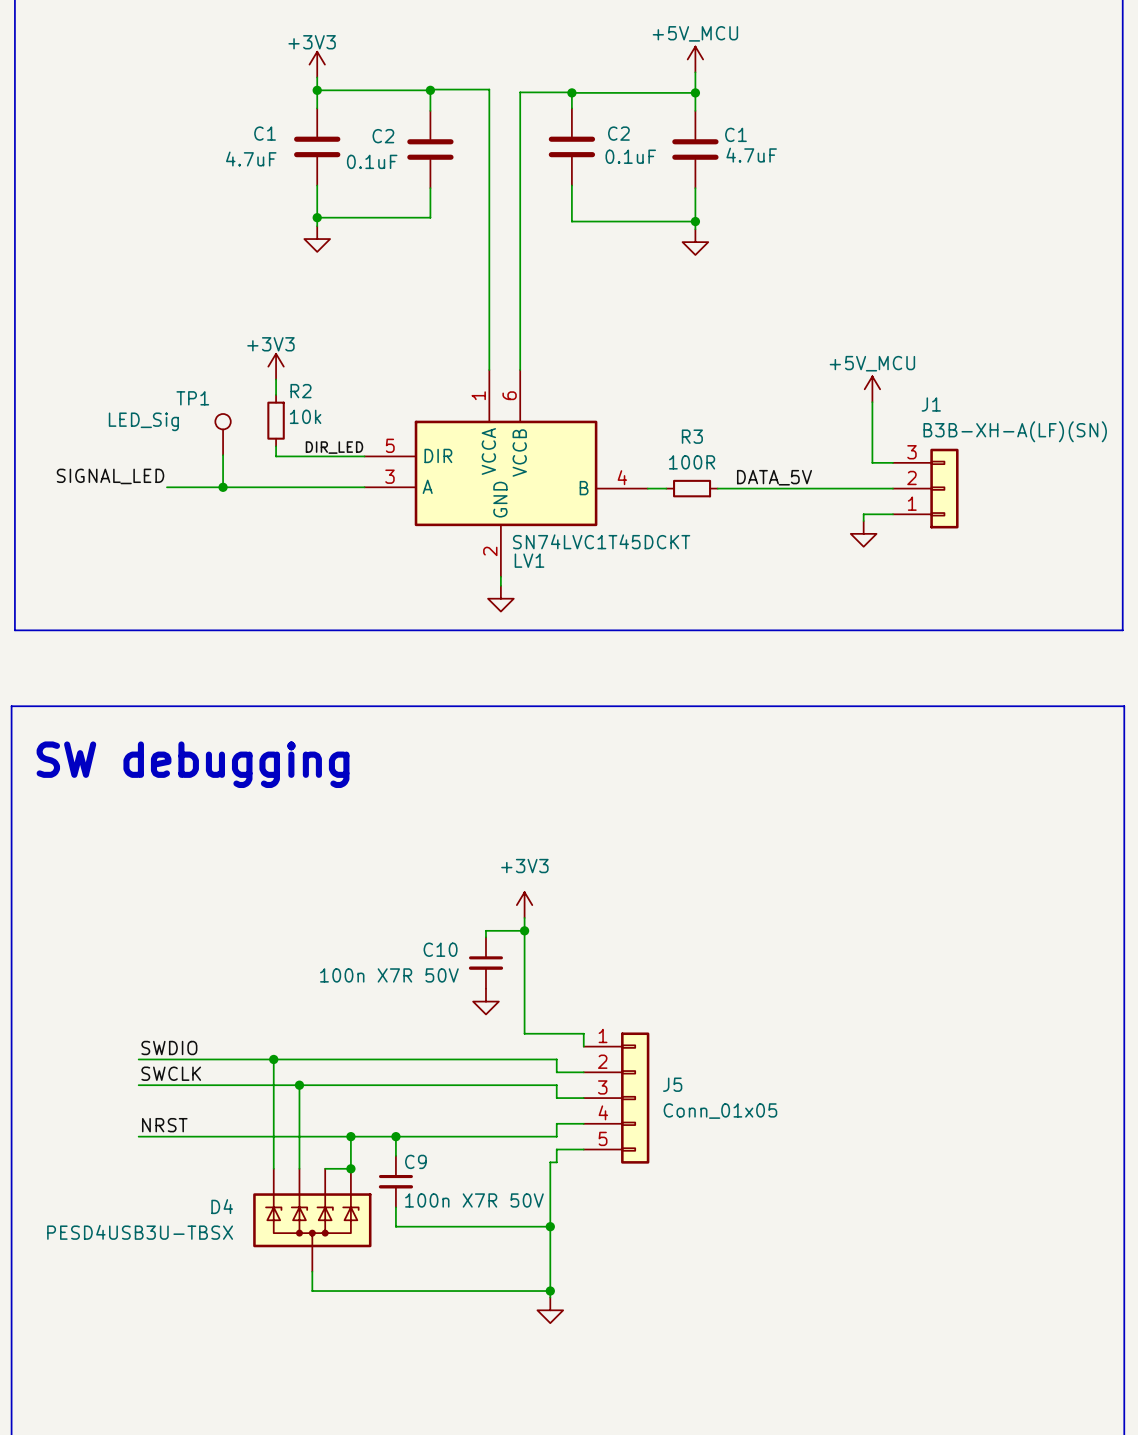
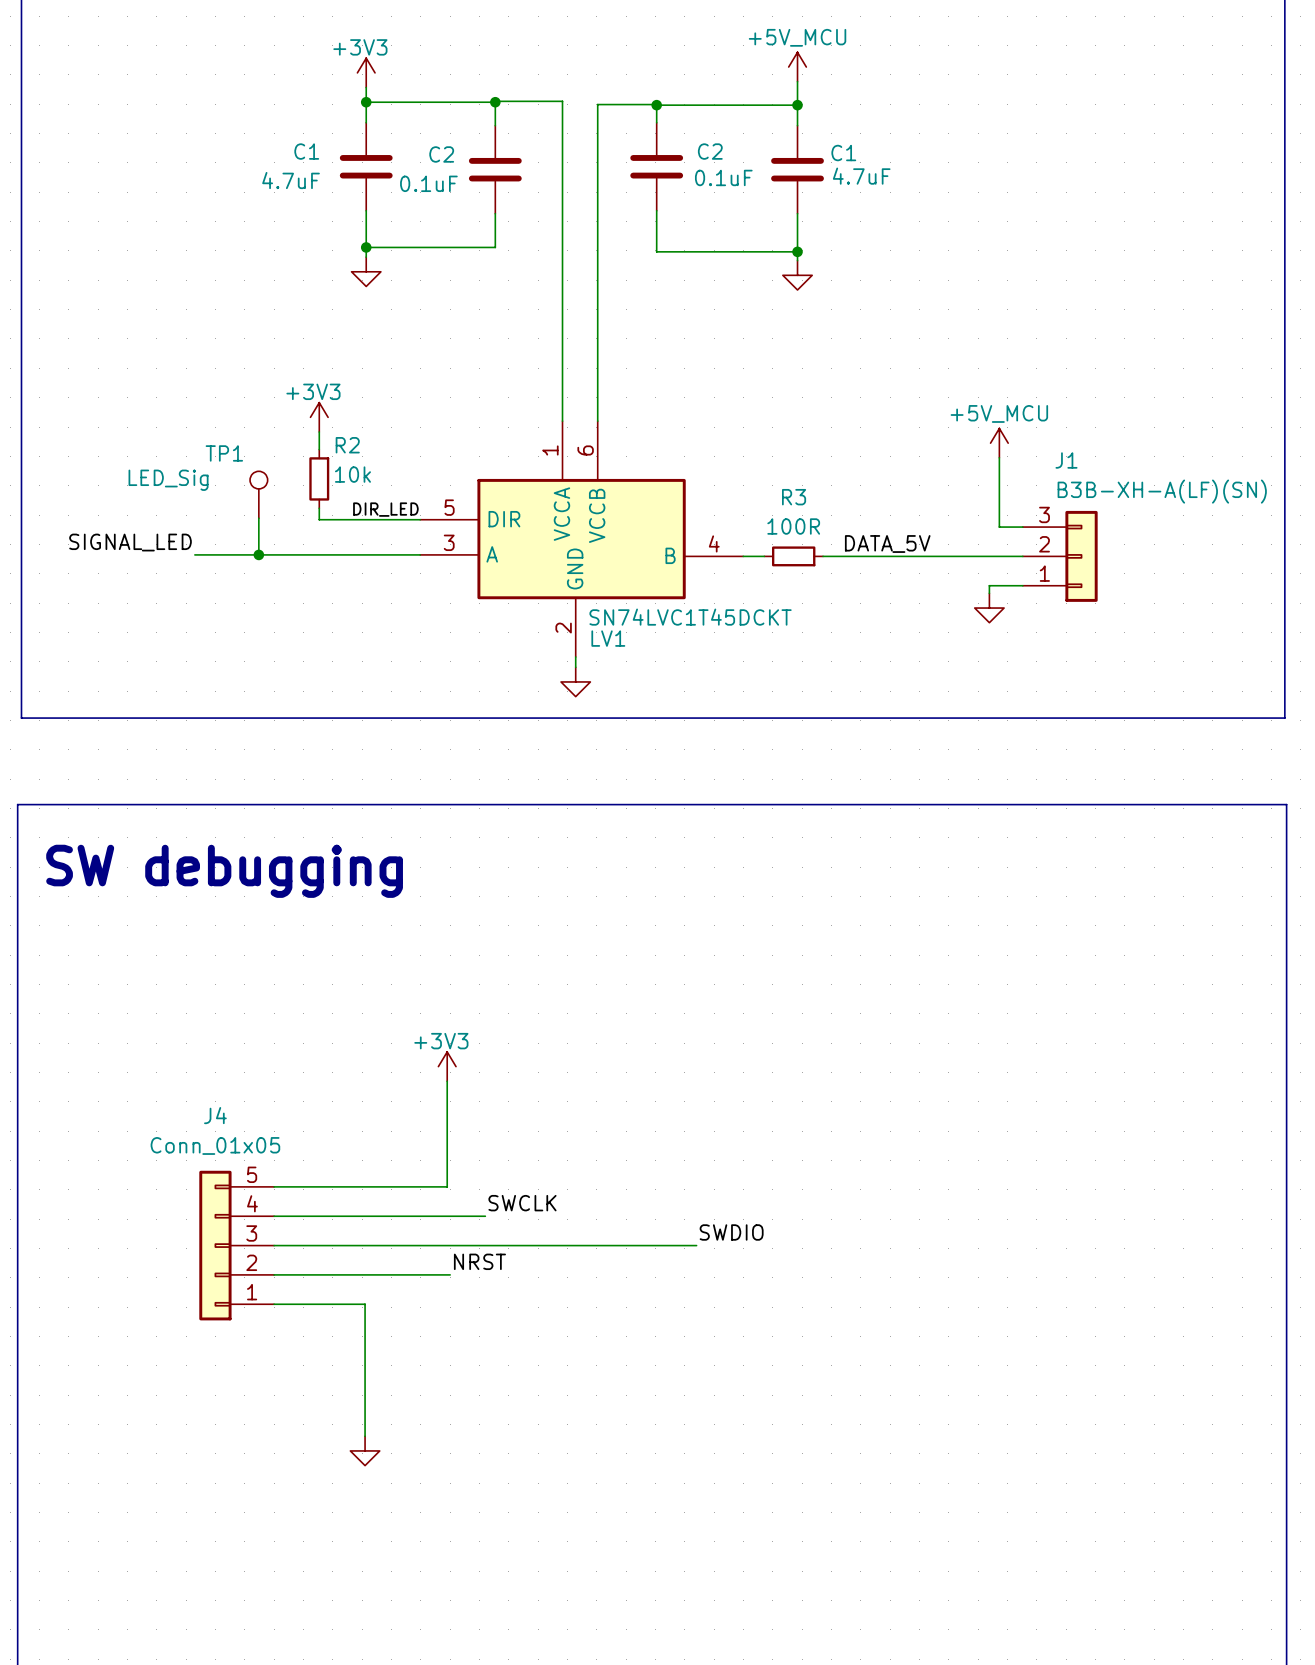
power symbol text position: +3V3 (524, 866) -> +3V3 (441, 1041)
power symbol position: +3V3 (524, 905) -> +3V3 (447, 1066)
wire: (524, 917) (524, 1033) (583, 1033) (583, 1046) -> none
wire: (524, 930) (485, 930) (485, 937) -> none
junction: (524, 930) -> none
wire: none -> (447, 1081) (447, 1186) (274, 1186)
C10: 100n X7R 50V (485, 962) -> none
power symbol: (485, 1001) -> none
label: SWDIO (169, 1047) -> none
label: none -> SWCLK (522, 1203)
wire: (138, 1059) (556, 1059) (556, 1072) (583, 1072) -> none
wire: (273, 1059) (273, 1168) -> none
junction: (273, 1059) -> none
wire: none -> (274, 1216) (485, 1216)
label: SWCLK (171, 1073) -> none
label: none -> SWDIO (731, 1232)
wire: (138, 1085) (556, 1085) (556, 1098) (583, 1098) -> none
wire: (299, 1085) (299, 1168) -> none
junction: (299, 1085) -> none
J4: none -> Conn_01x05 (236, 1245)
wire: none -> (274, 1245) (696, 1245)
J5: Conn_01x05 (616, 1098) -> none
wire: none -> (274, 1274) (450, 1274)
wire: (583, 1123) (556, 1123) (556, 1136) (138, 1136) -> none
label position: NRST (164, 1125) -> NRST (479, 1261)
wire: (350, 1136) (350, 1168) (325, 1168) -> none
junction: (350, 1136) -> none
wire: (395, 1136) (395, 1155) -> none
junction: (395, 1136) -> none
wire: none -> (274, 1304) (365, 1304) (365, 1436)
wire: (583, 1149) (556, 1149) (556, 1162) (550, 1162) (550, 1297) -> none
junction: (350, 1168) -> none
C9: 100n X7R 50V (395, 1181) -> none
wire: (395, 1207) (395, 1226) (550, 1226) -> none
D4: PESD4USB3U-TBSX (312, 1220) -> none
junction: (550, 1226) -> none
wire: (312, 1271) (312, 1291) (550, 1291) -> none
power symbol: none -> (365, 1450)
junction: (550, 1291) -> none
power symbol: (550, 1310) -> none

